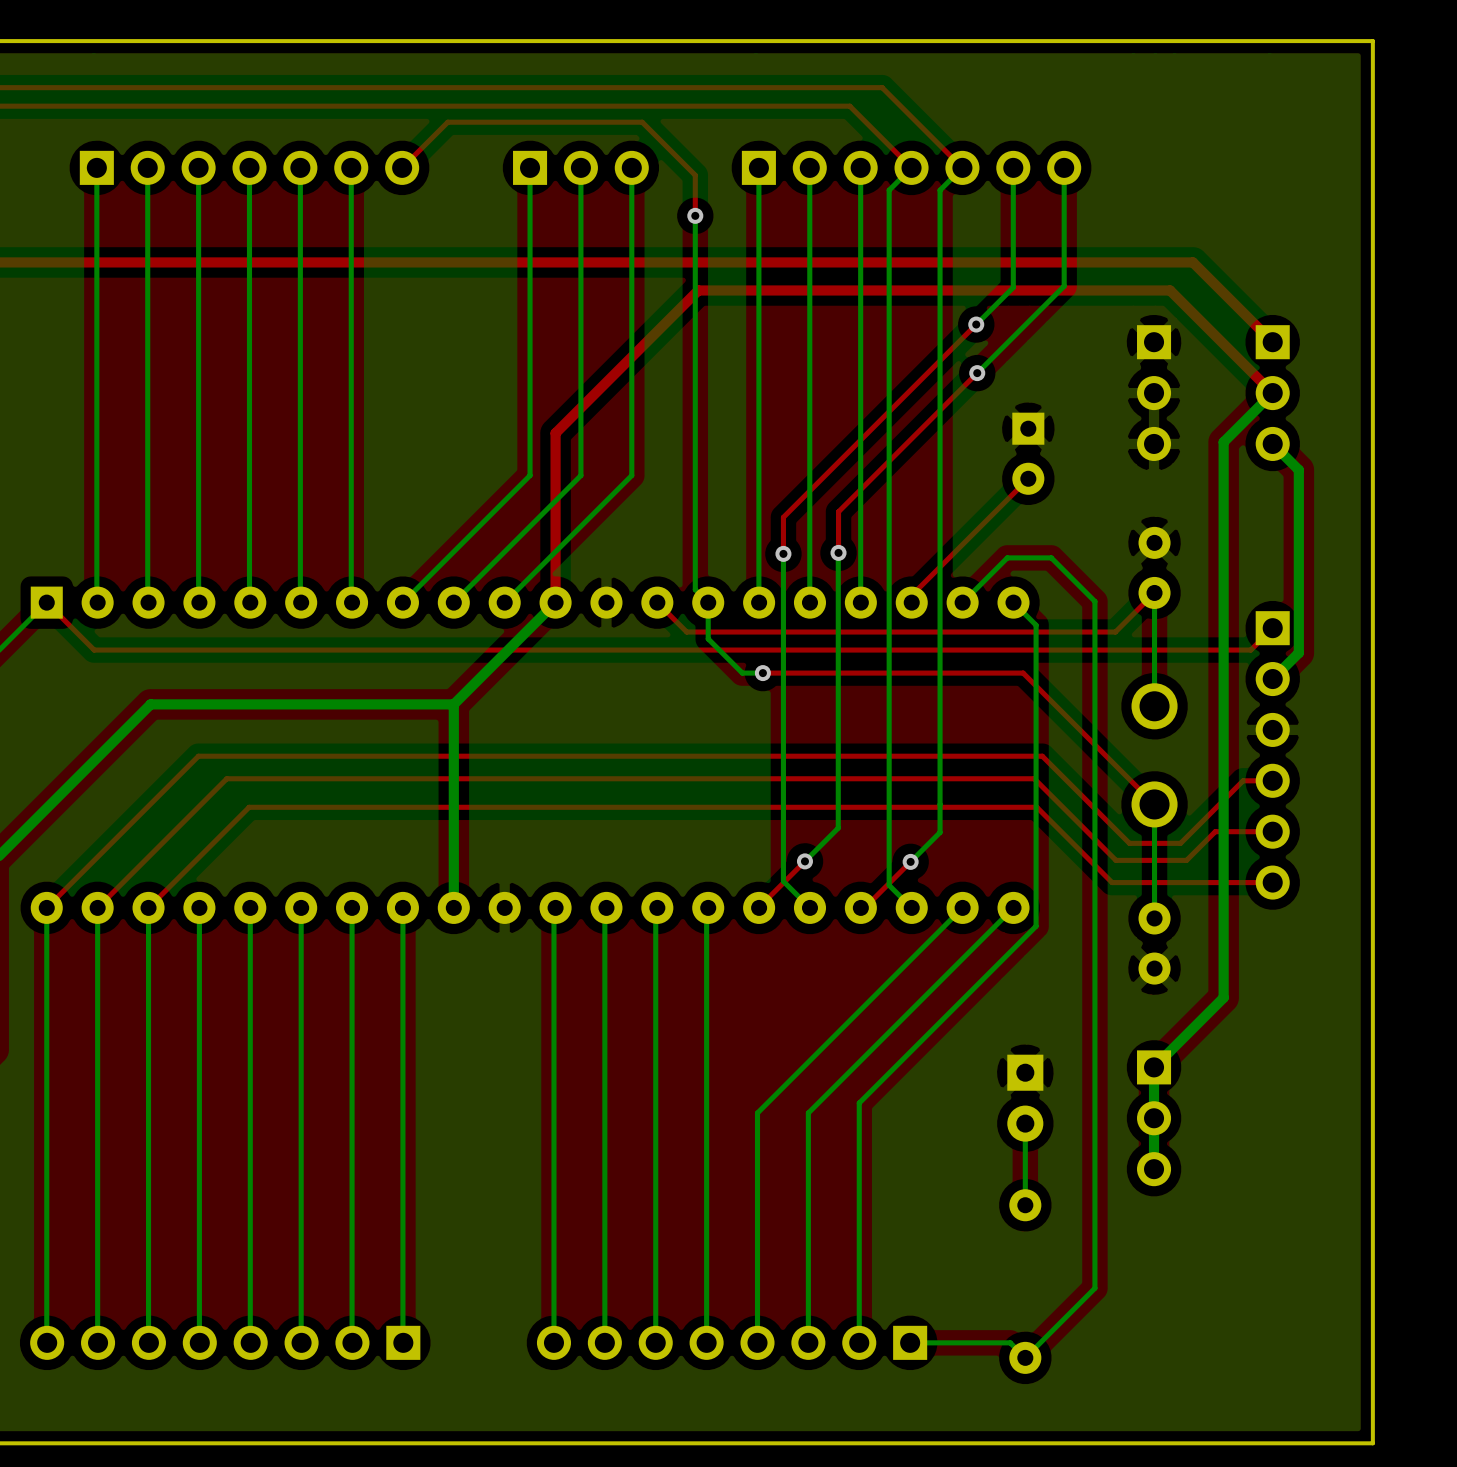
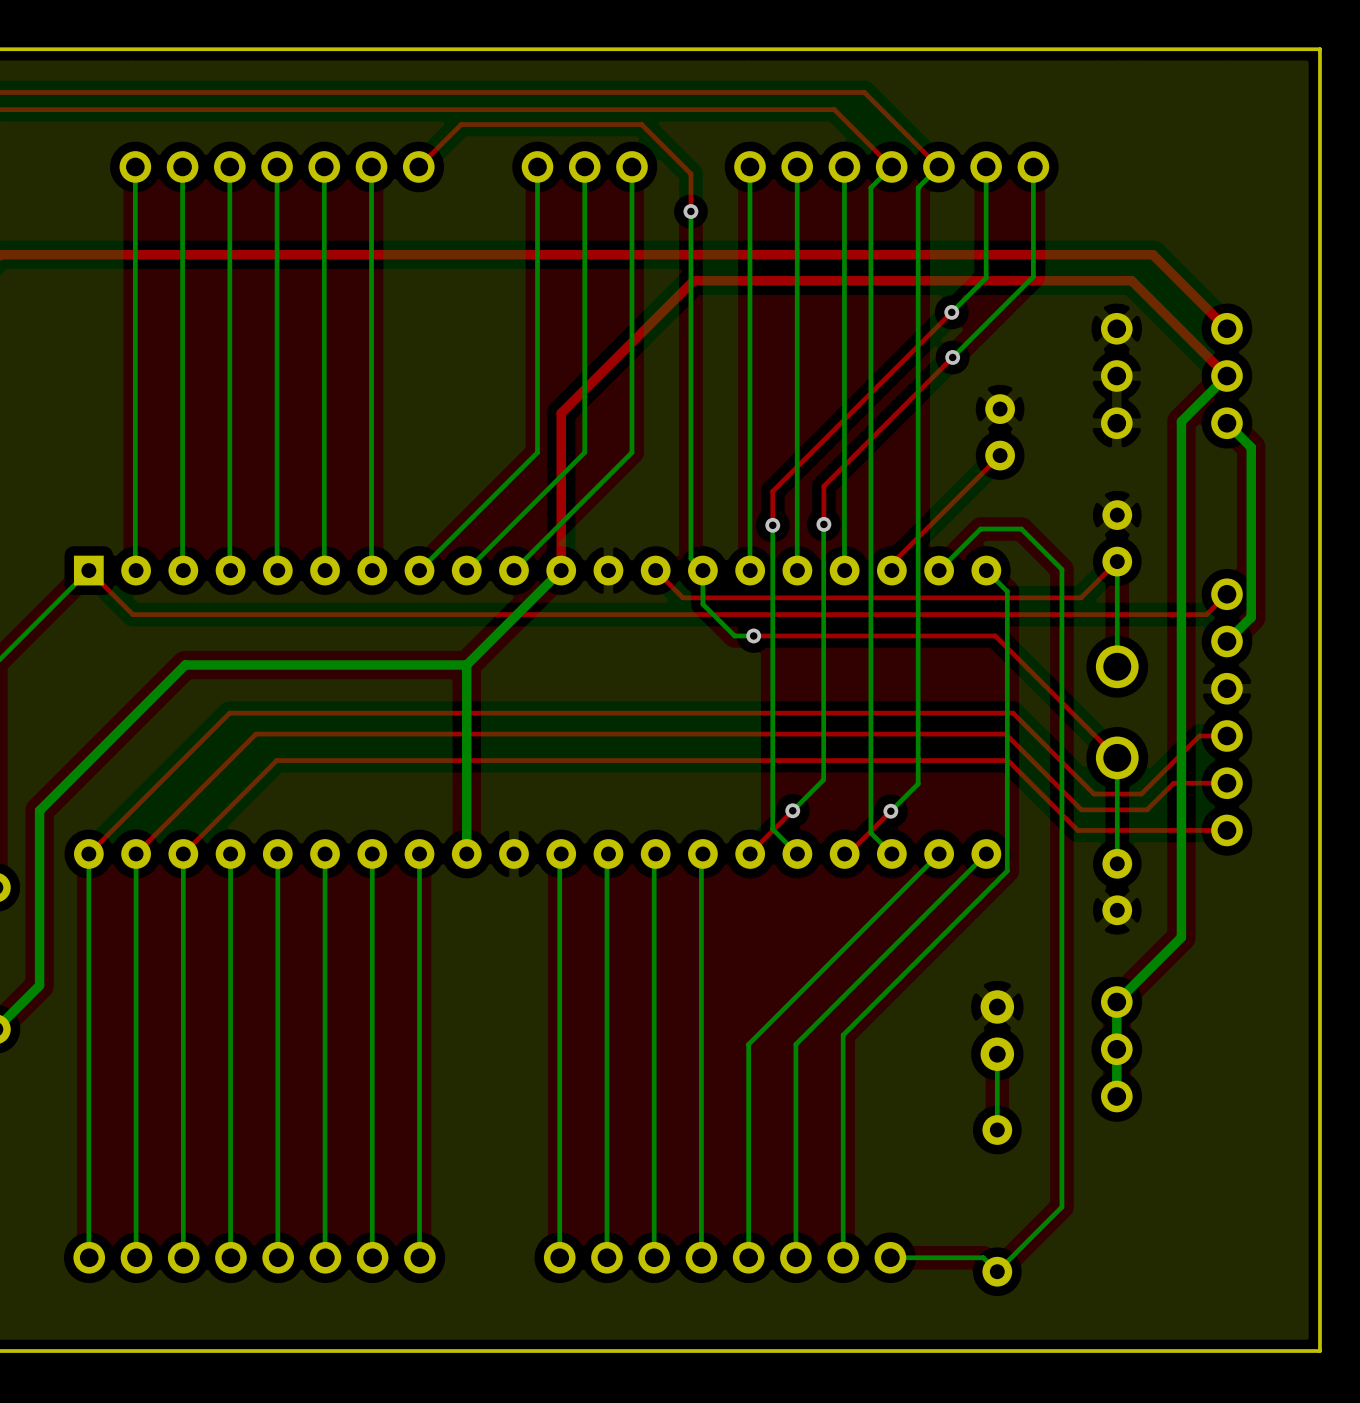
part footprint: [79, 150, 420, 185] -> [119, 151, 435, 183]
part footprint: [513, 150, 649, 185] -> [521, 151, 648, 183]
part footprint: [741, 150, 1082, 185] -> [734, 151, 1050, 183]
part footprint: [1137, 325, 1172, 461] -> [1100, 312, 1133, 440]
part footprint: [1255, 325, 1290, 461] -> [1211, 312, 1243, 440]
part footprint: [1012, 412, 1045, 495] -> [985, 394, 1015, 471]
part footprint: [1255, 611, 1290, 900] -> [1211, 578, 1243, 847]
part footprint: [1137, 1050, 1172, 1187] -> [1100, 986, 1133, 1113]
part footprint: [1007, 1054, 1044, 1142] -> [980, 990, 1015, 1071]
part footprint: [30, 1325, 421, 1360] -> [73, 1241, 436, 1274]
part footprint: [536, 1325, 928, 1360] -> [543, 1241, 907, 1274]

